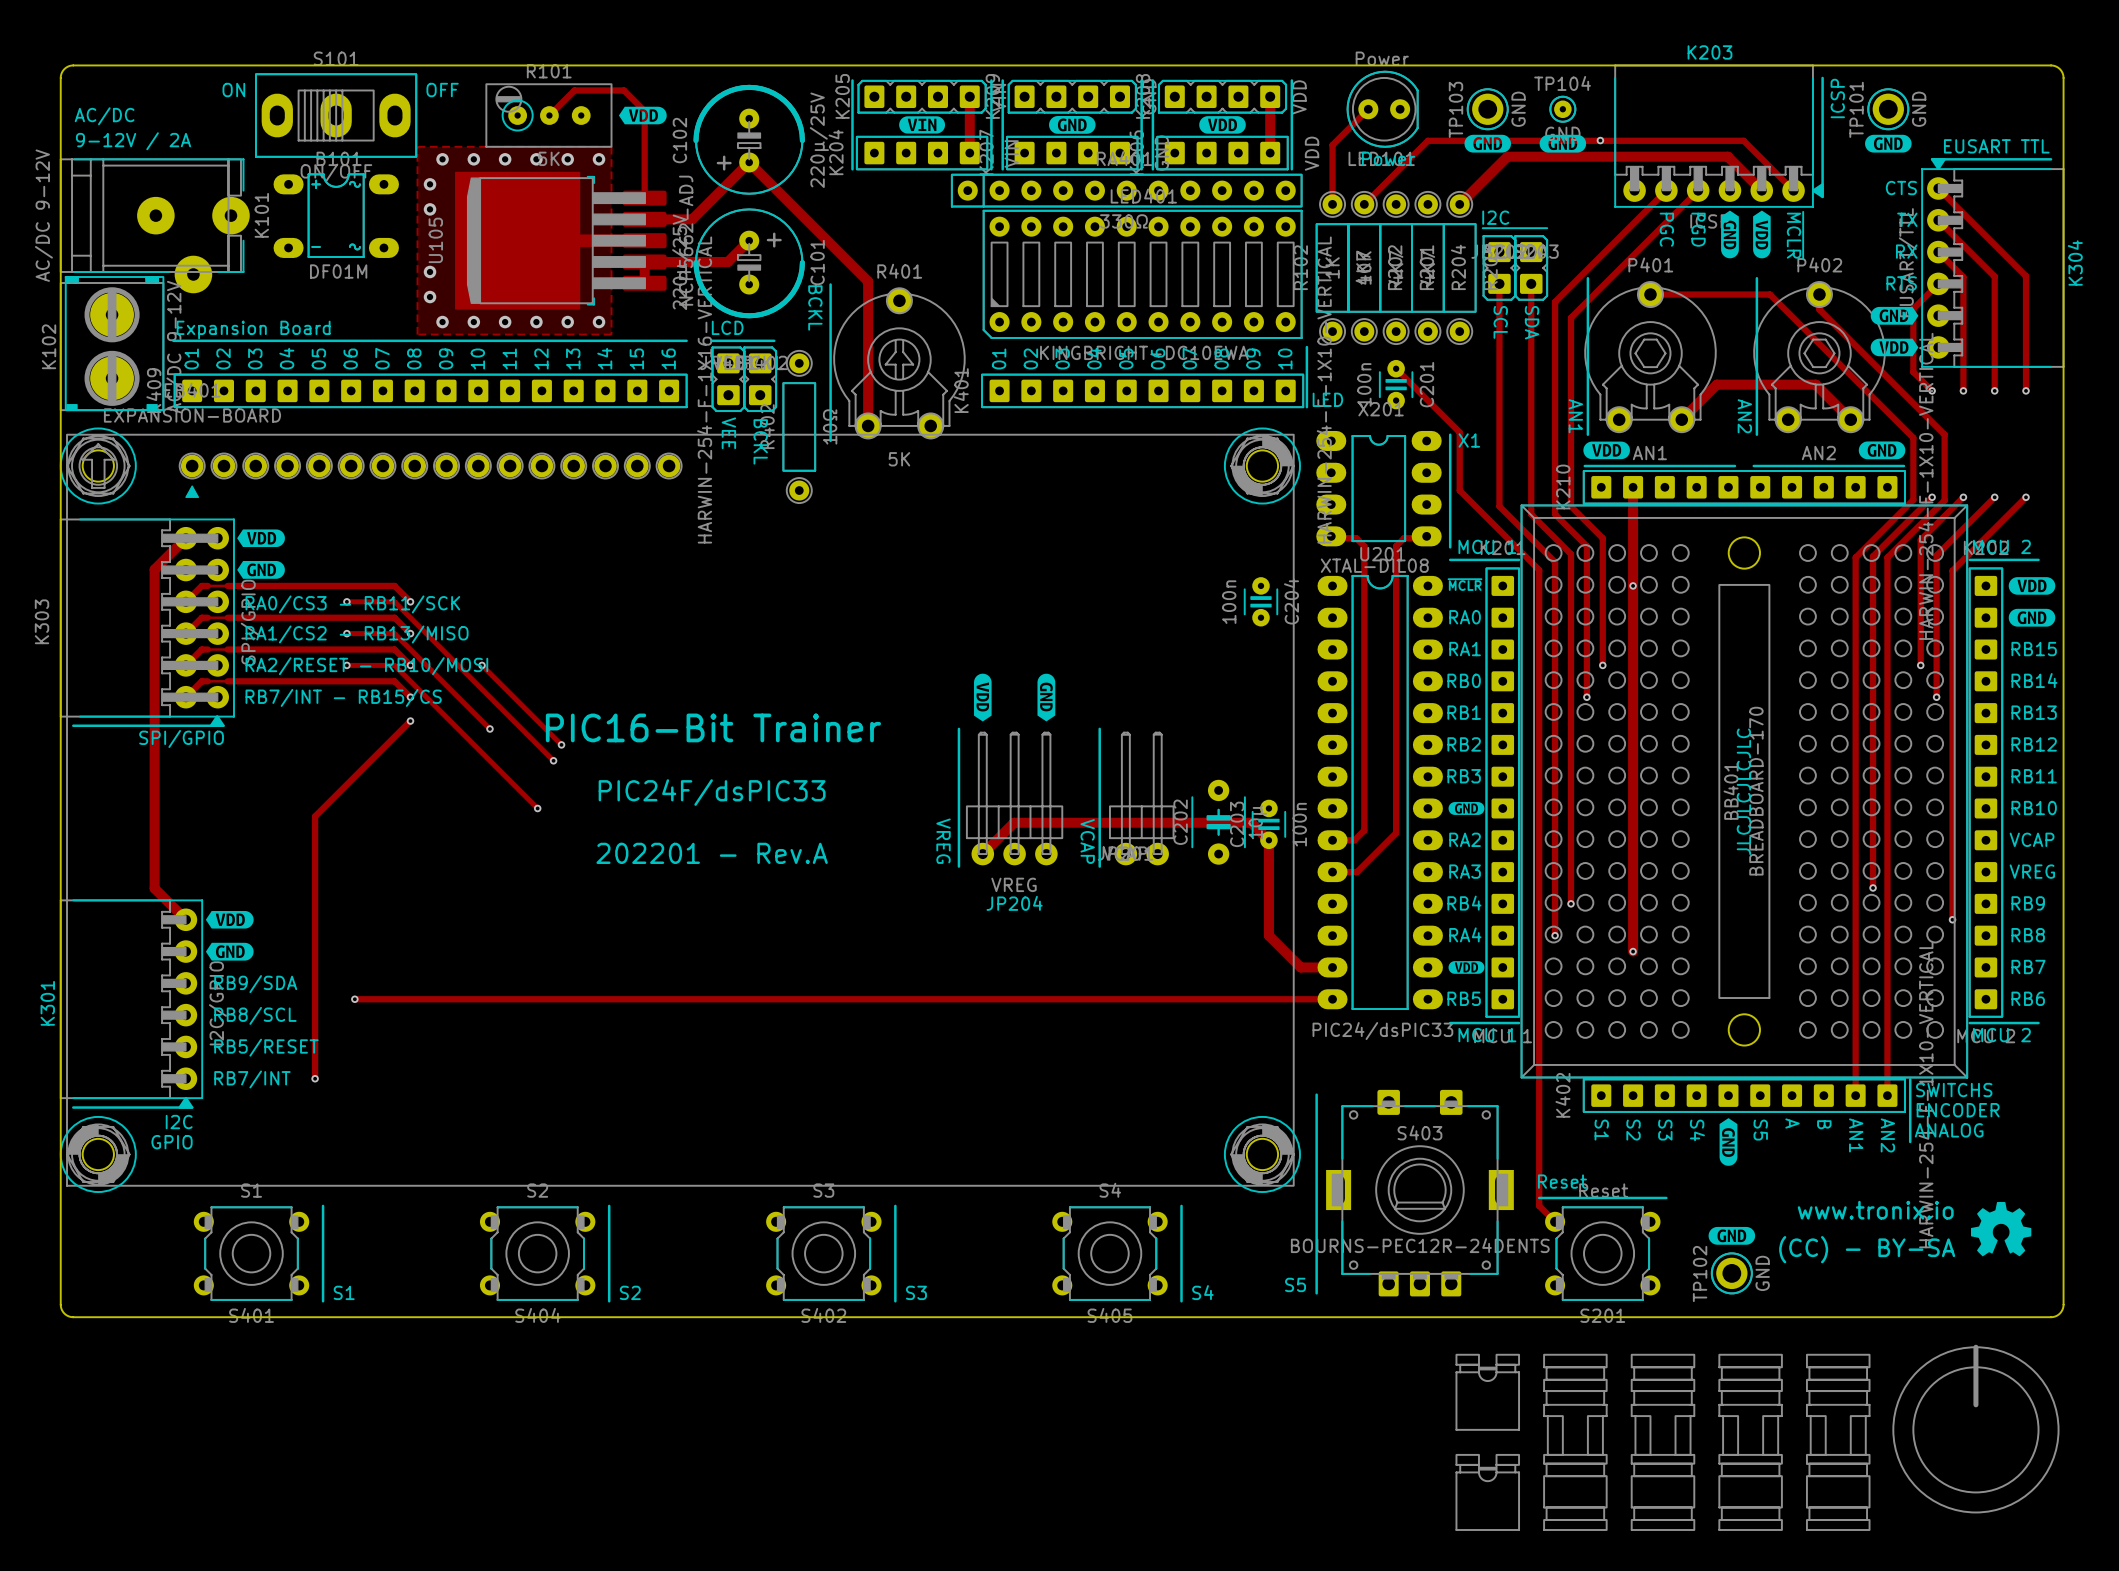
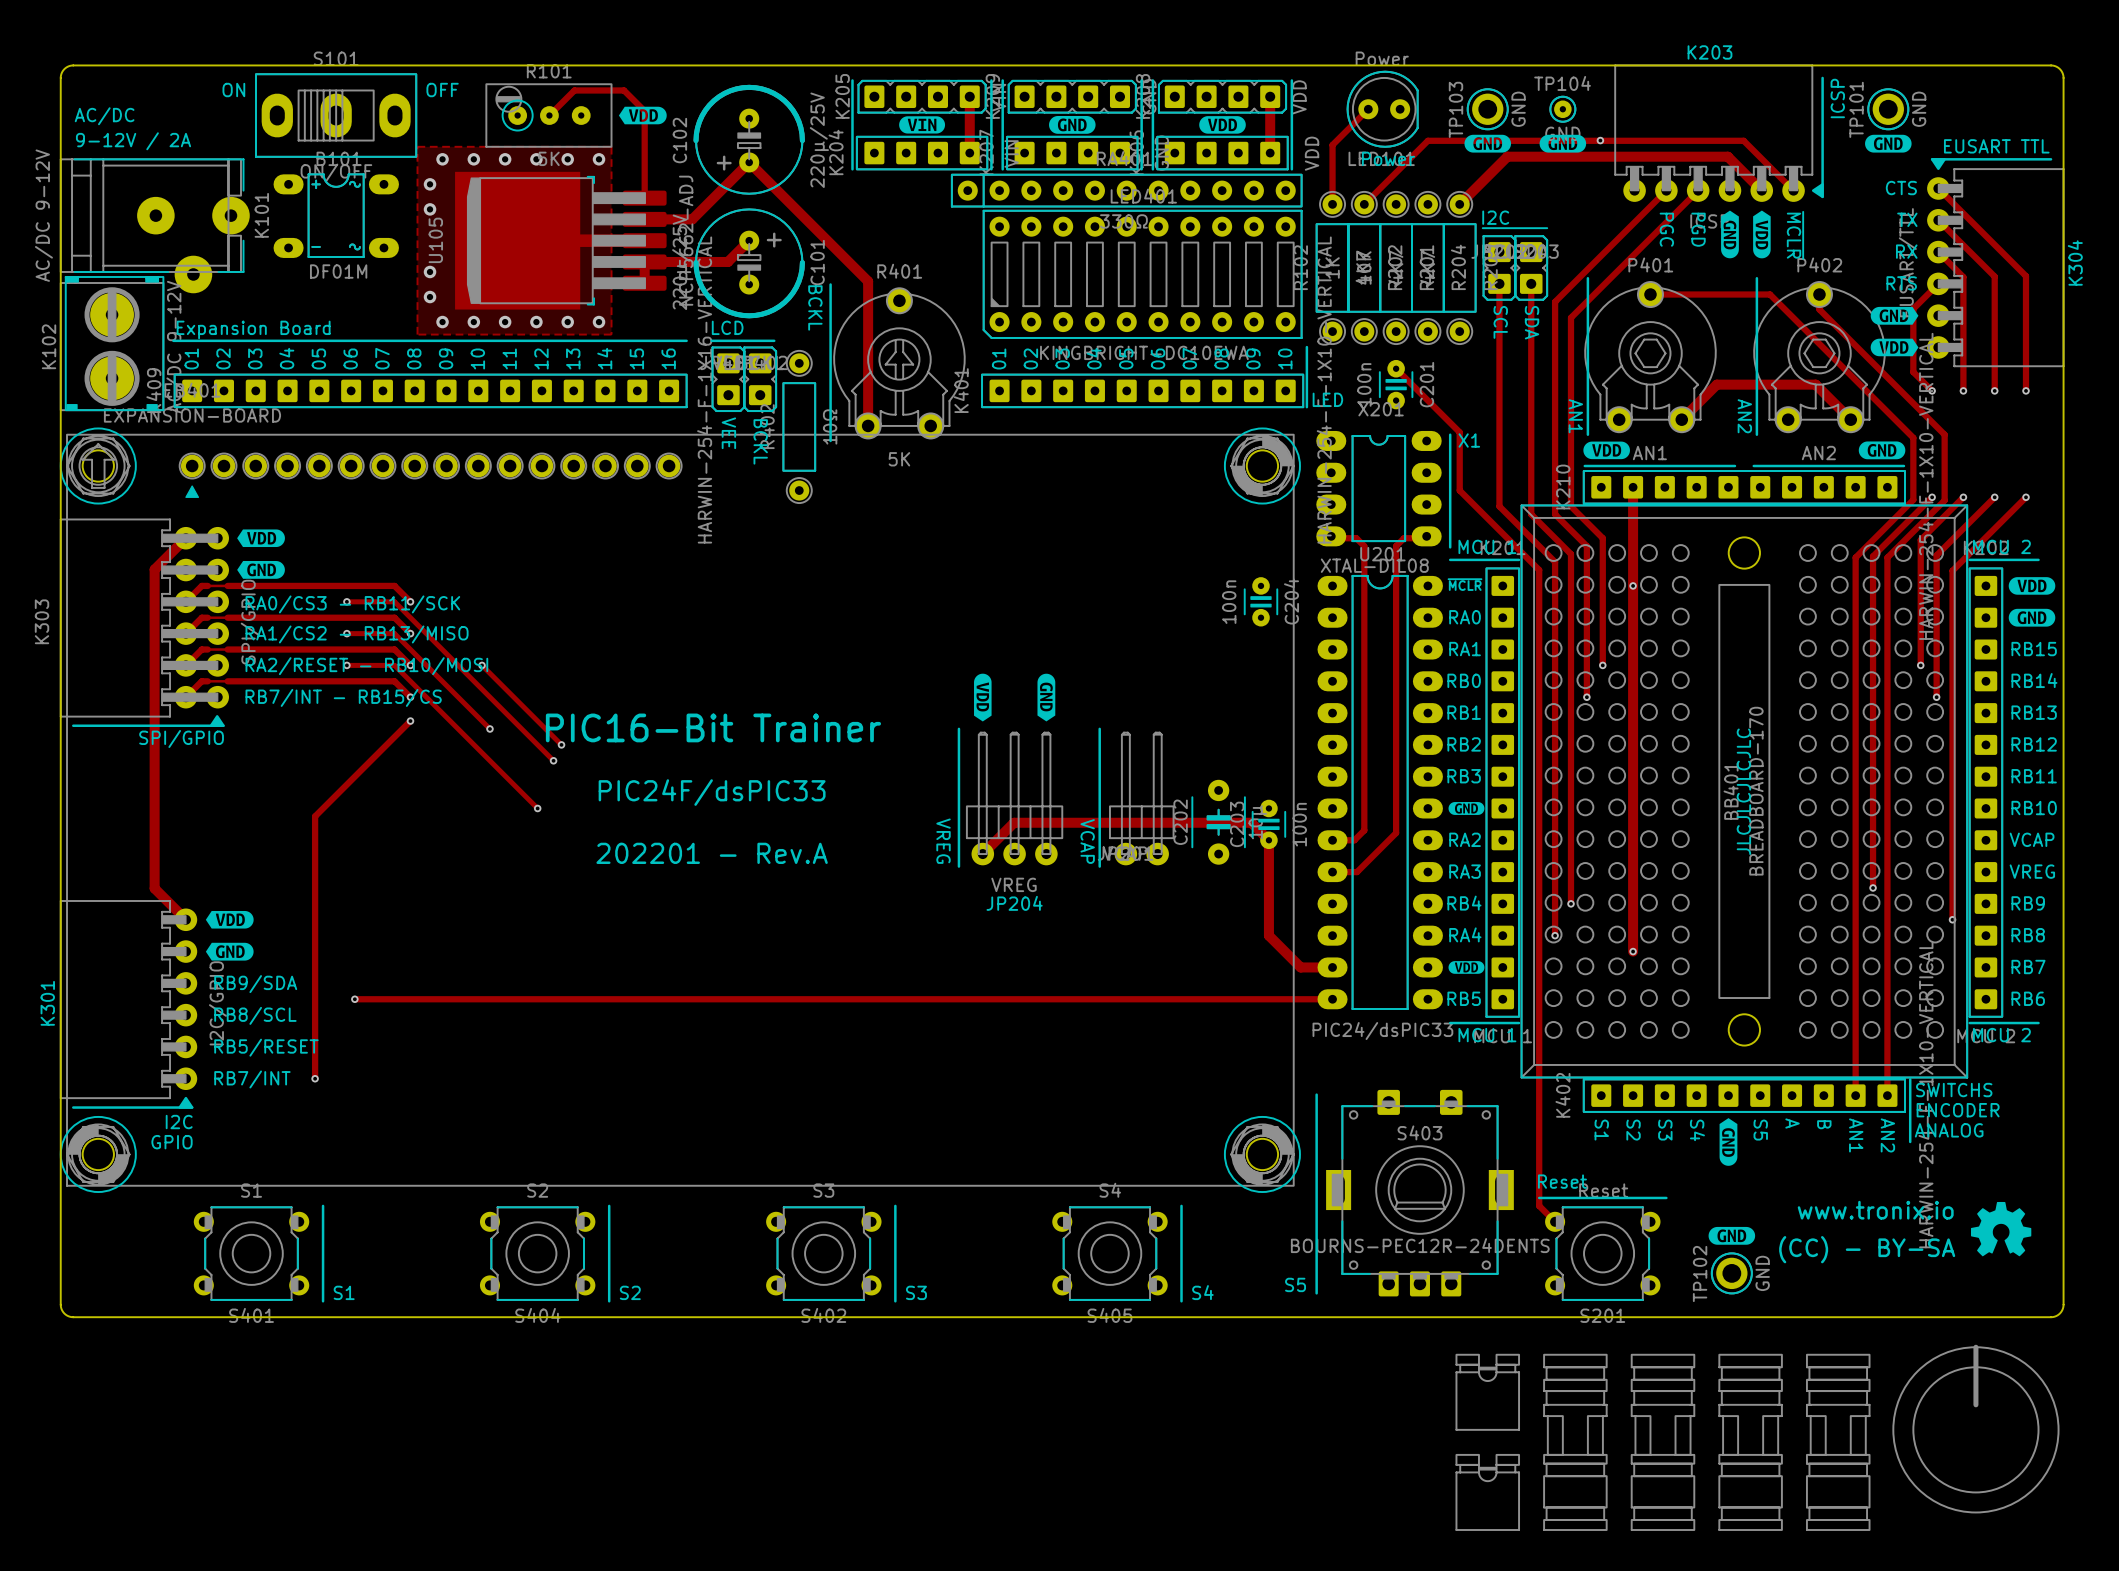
K203 footprint: [1614, 64, 1814, 208] -> [1614, 64, 1813, 202]
K304 footprint: [1921, 168, 2065, 368] -> [1927, 168, 2065, 367]
K303 footprint: [60, 518, 235, 718] -> [60, 518, 229, 718]
K301 footprint: [60, 899, 203, 1099] -> [60, 900, 198, 1099]

